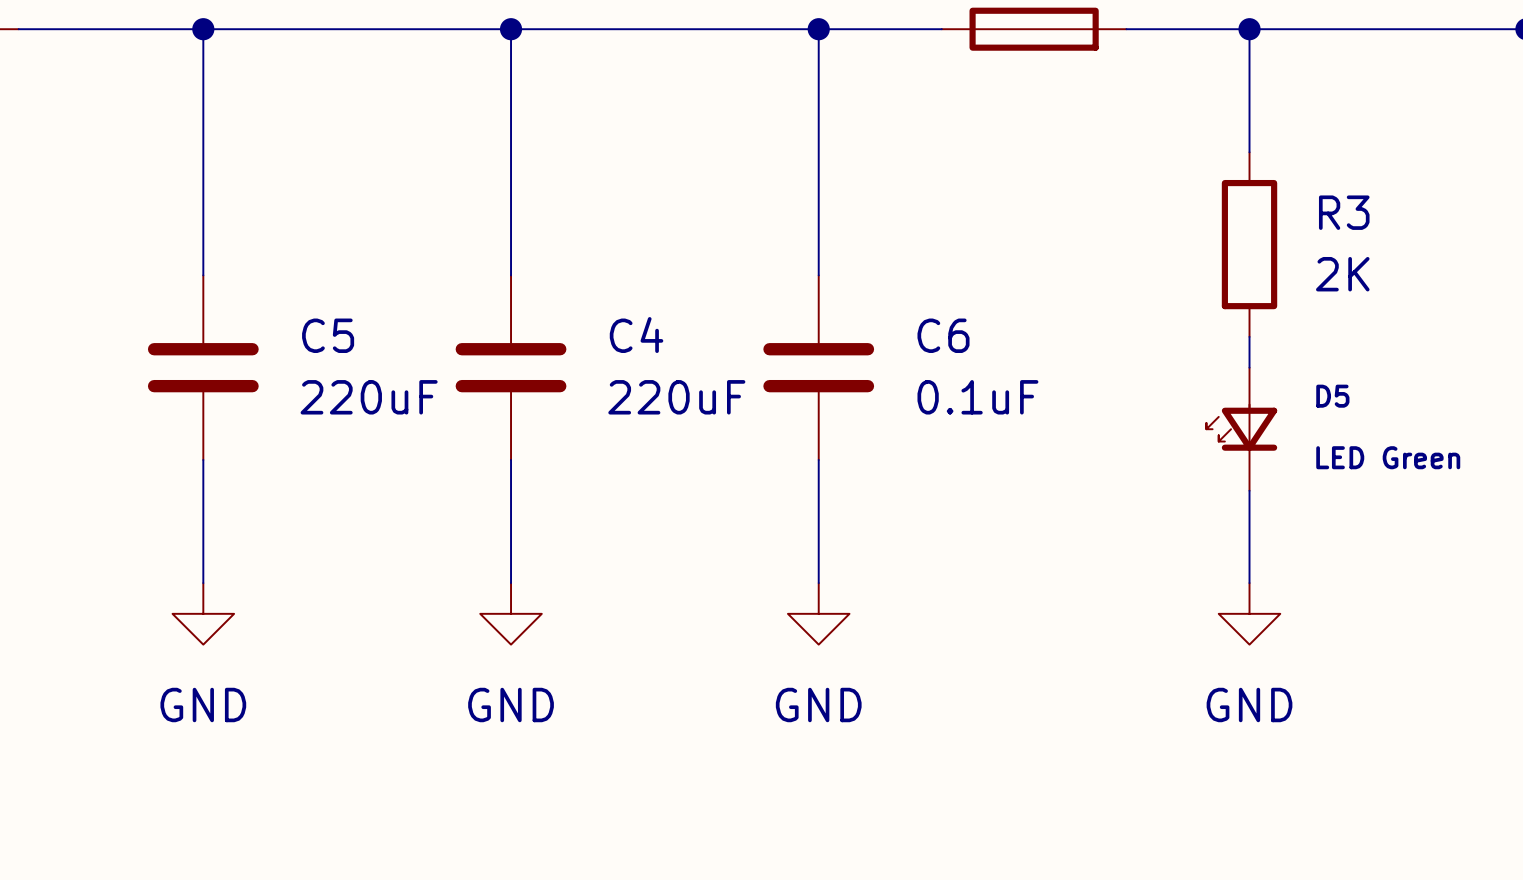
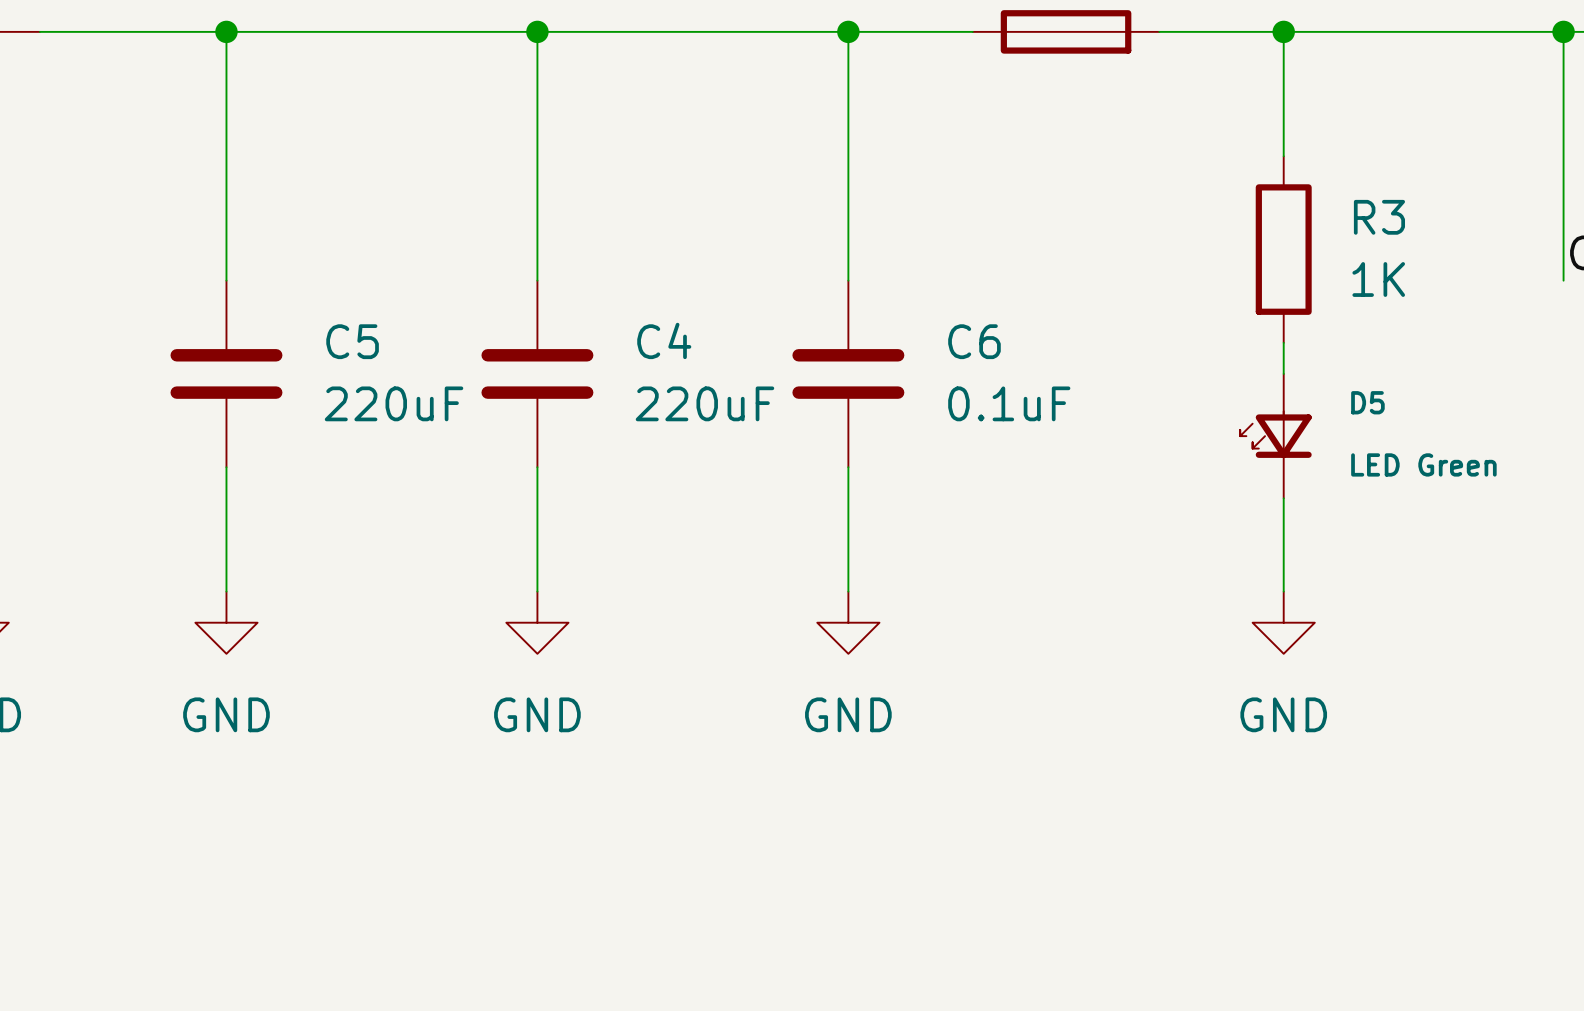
R3 value: 2K (1342, 274) -> 1K (1378, 279)

